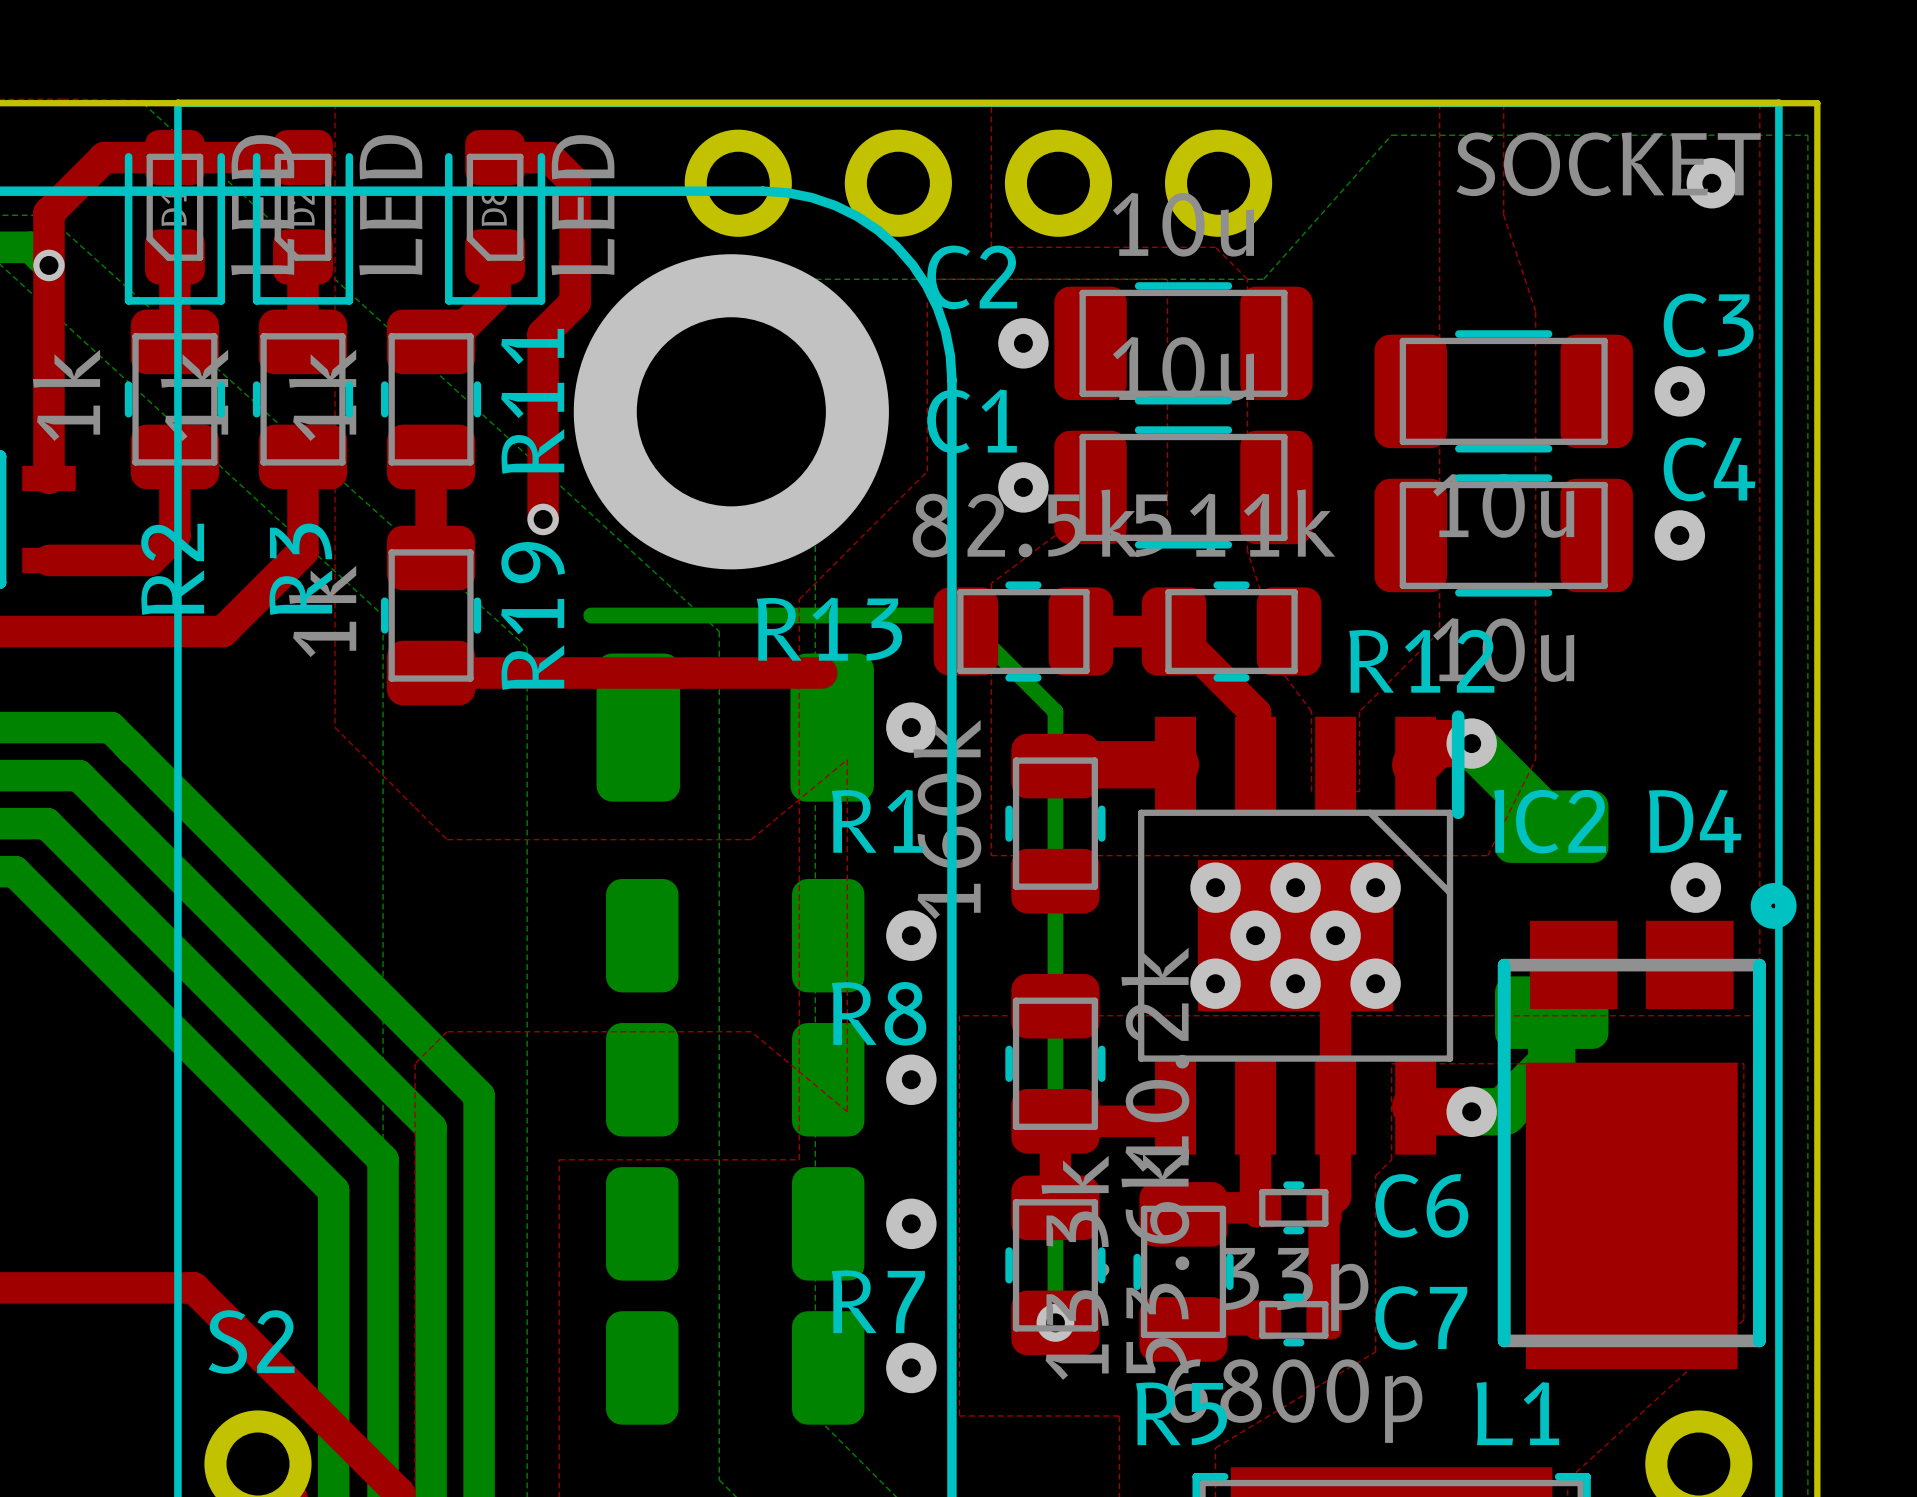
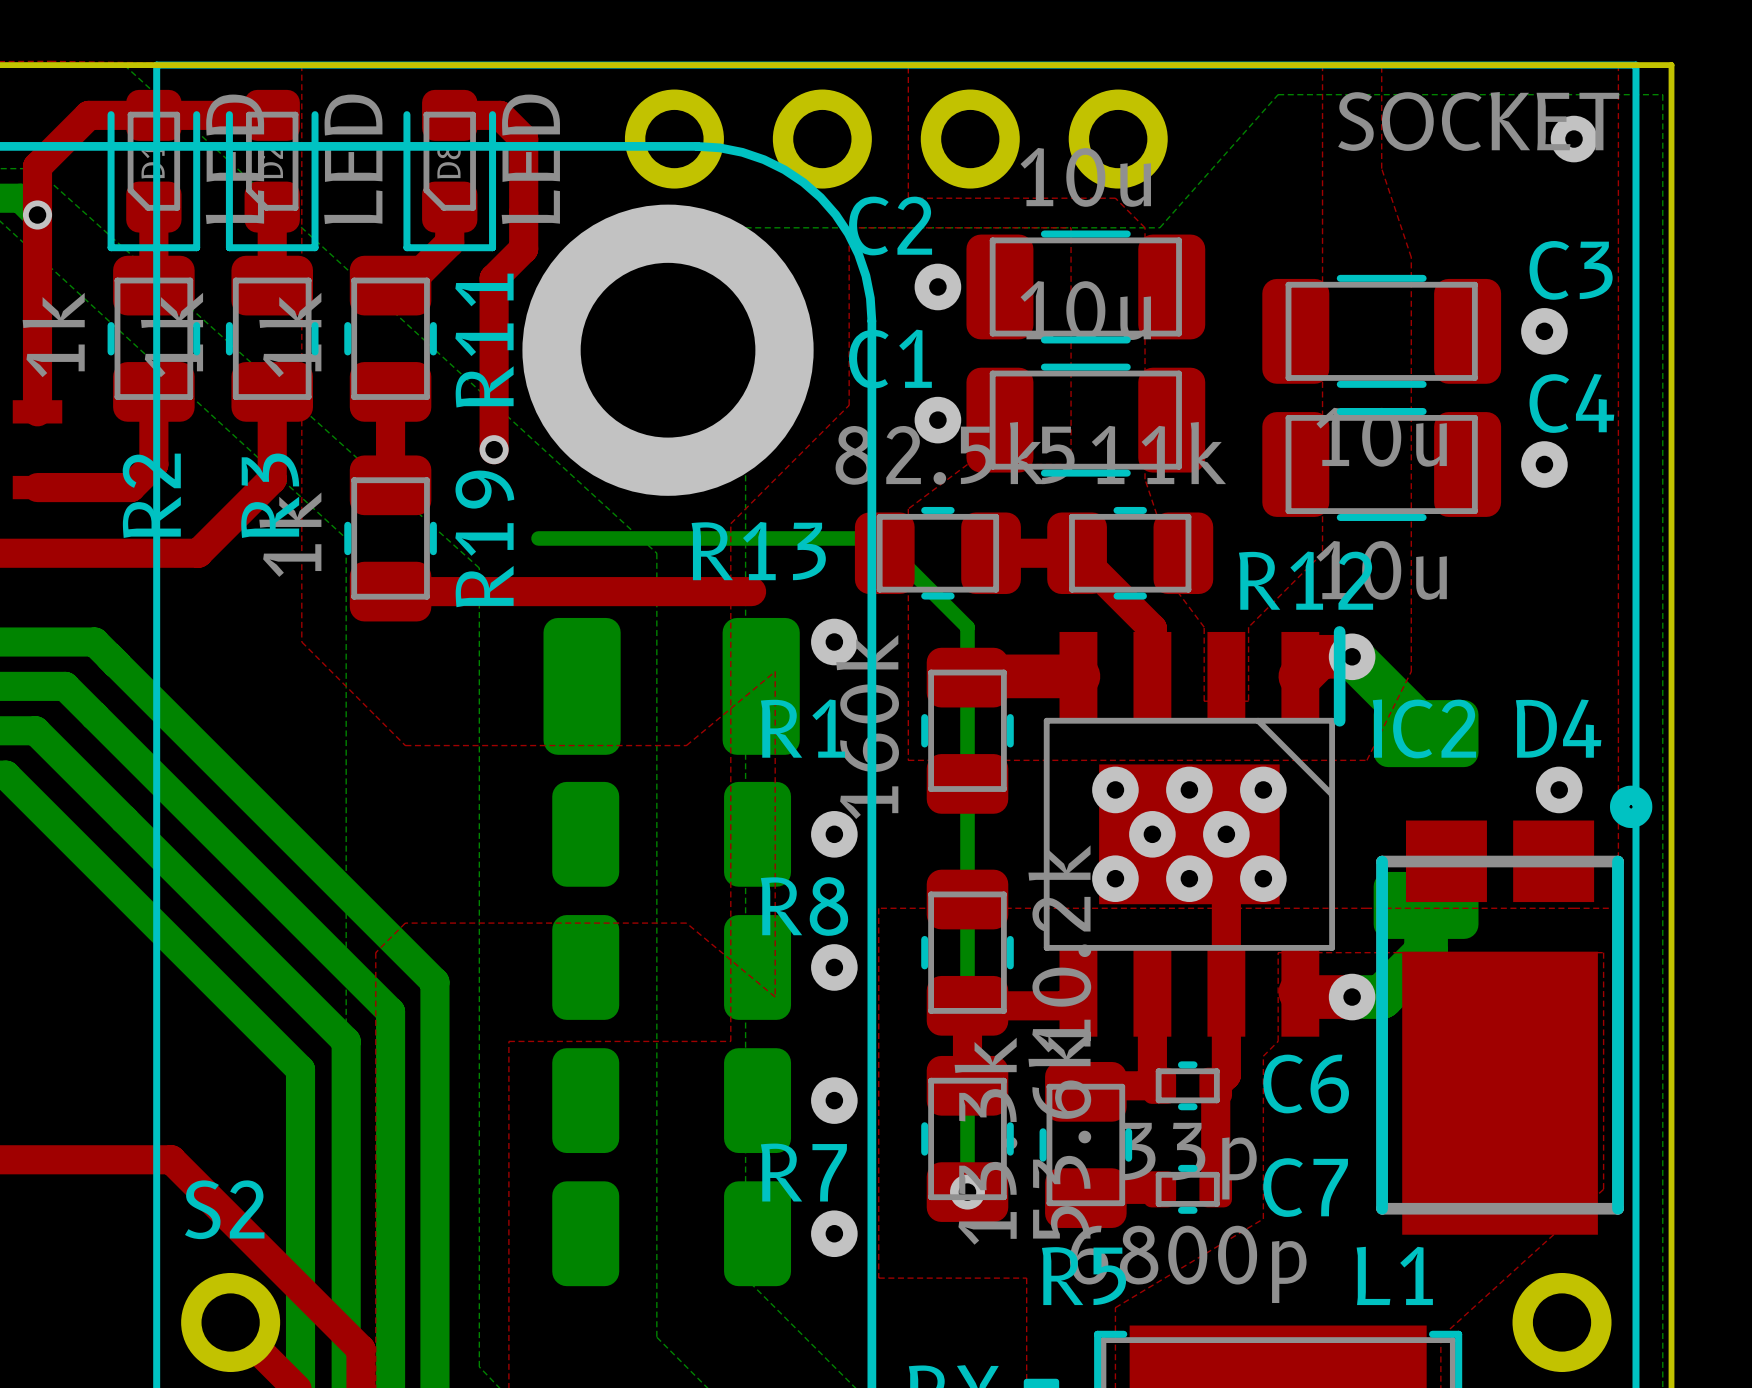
part position: (735, 727) -> (671, 686)

